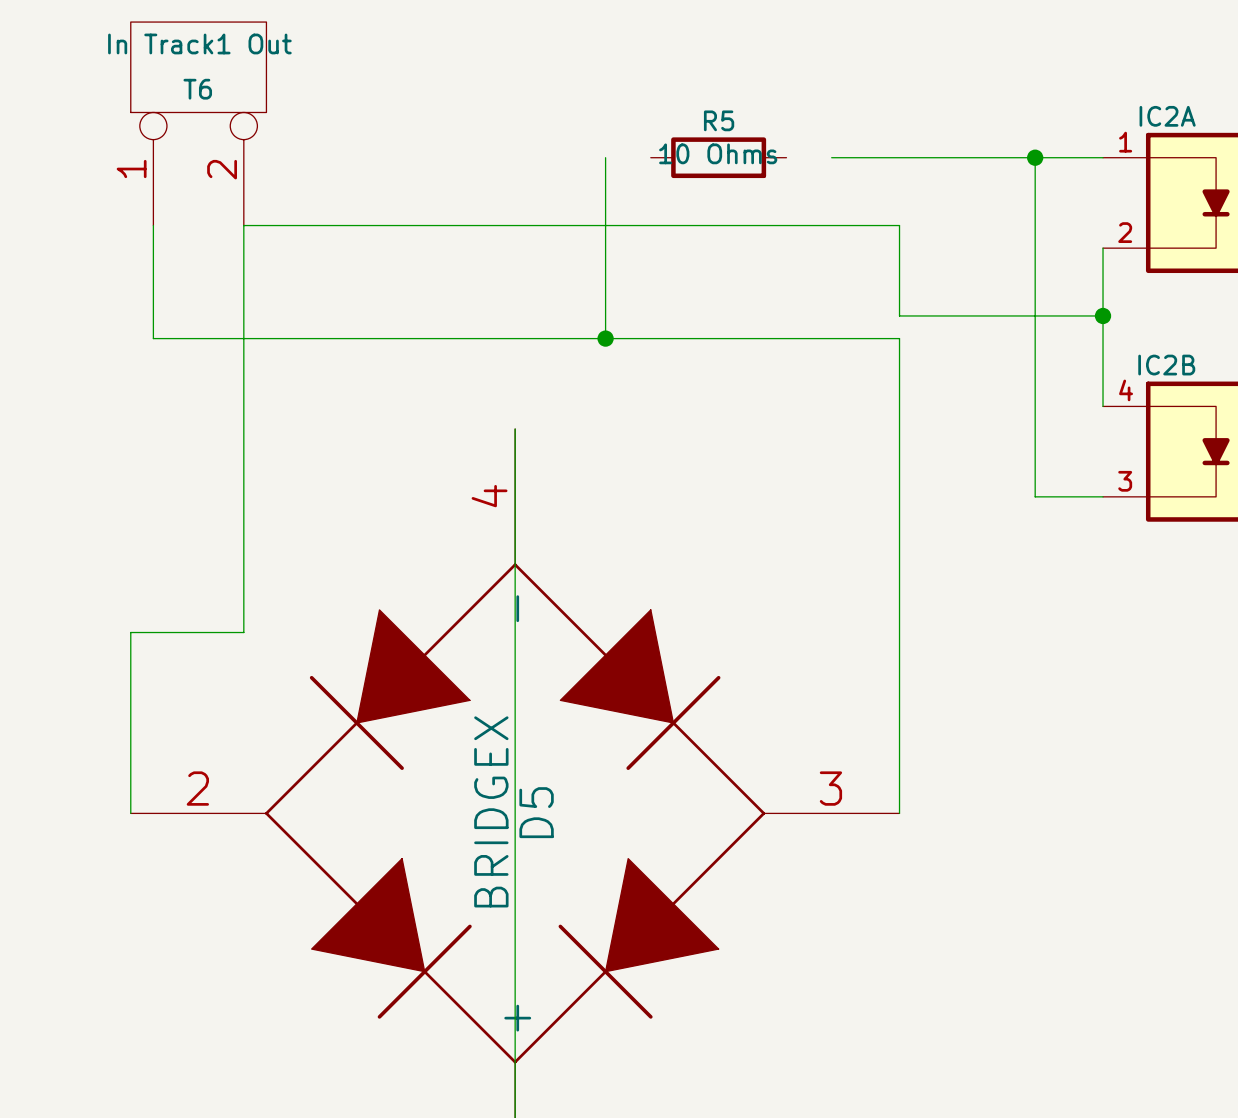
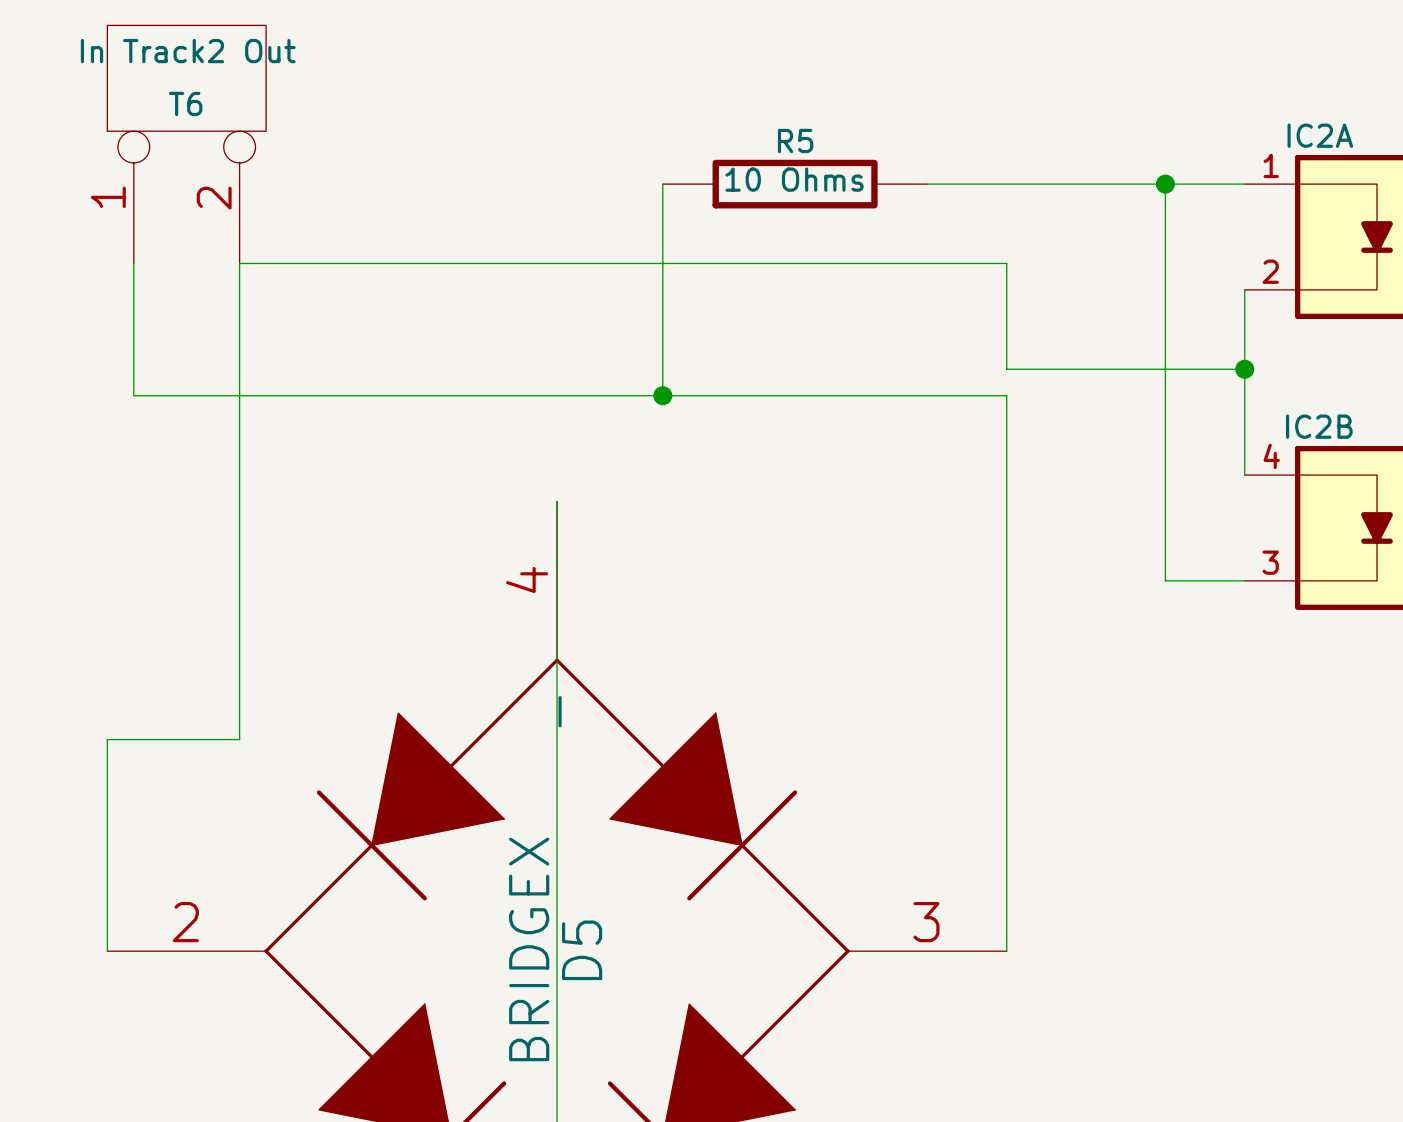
T6 value: In Track1 Out (199, 43) -> In Track2 Out (188, 51)
R5 symbol: [650, 137, 787, 179] -> [662, 159, 928, 209]

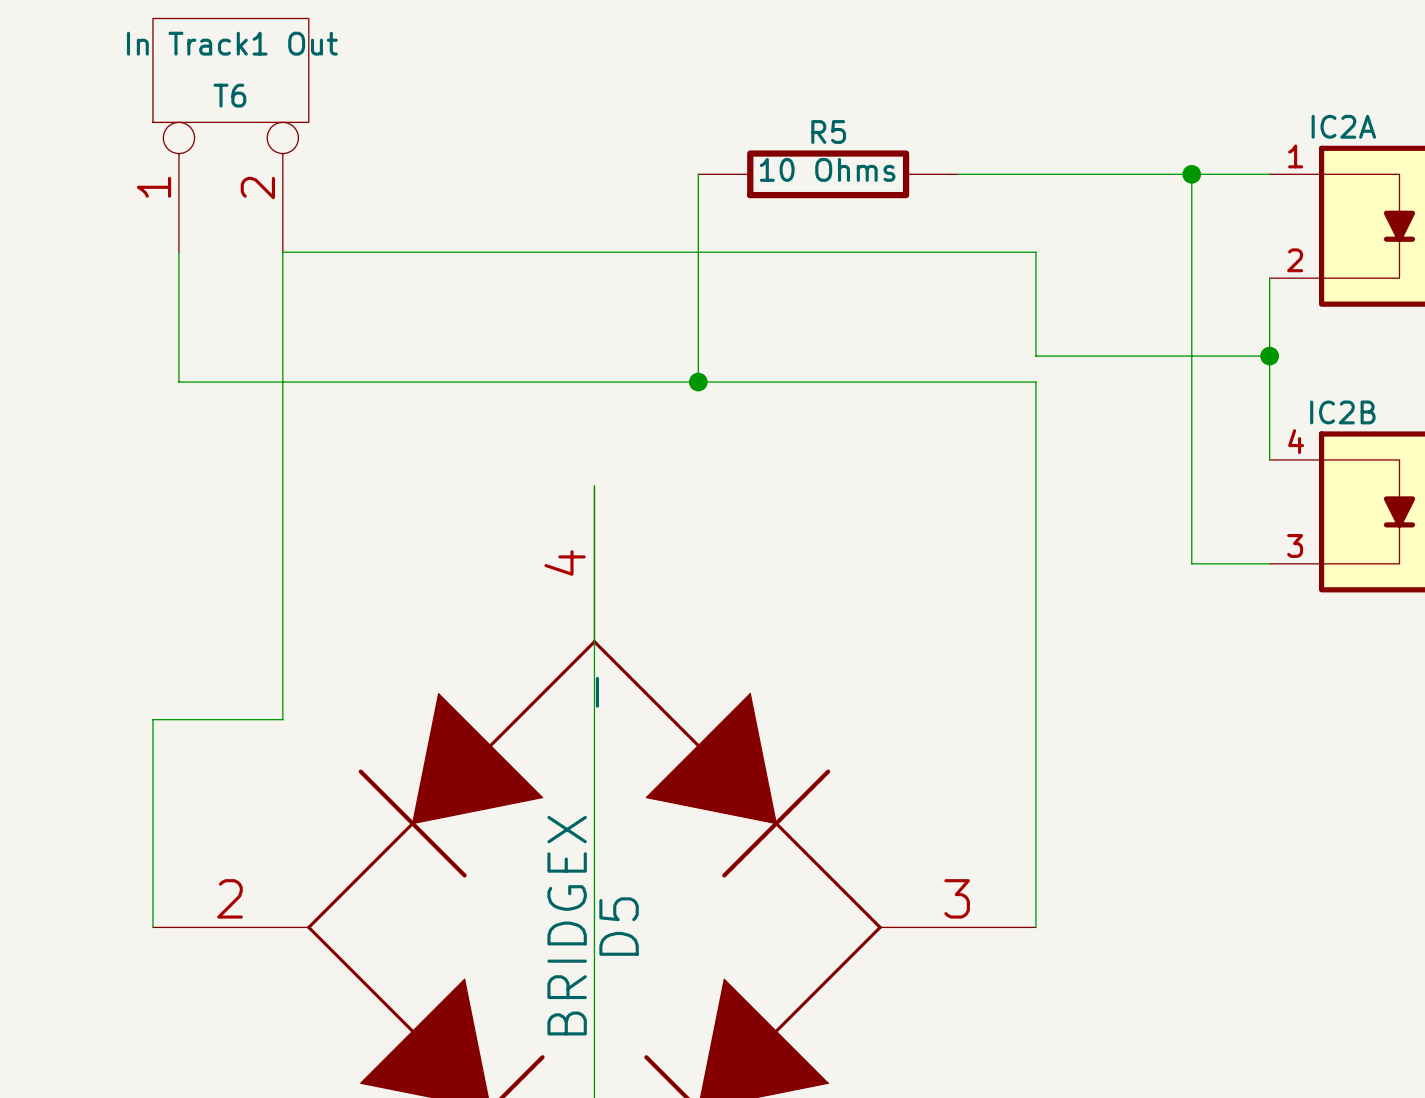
T6 value: In Track2 Out (188, 51) -> In Track1 Out (232, 43)

